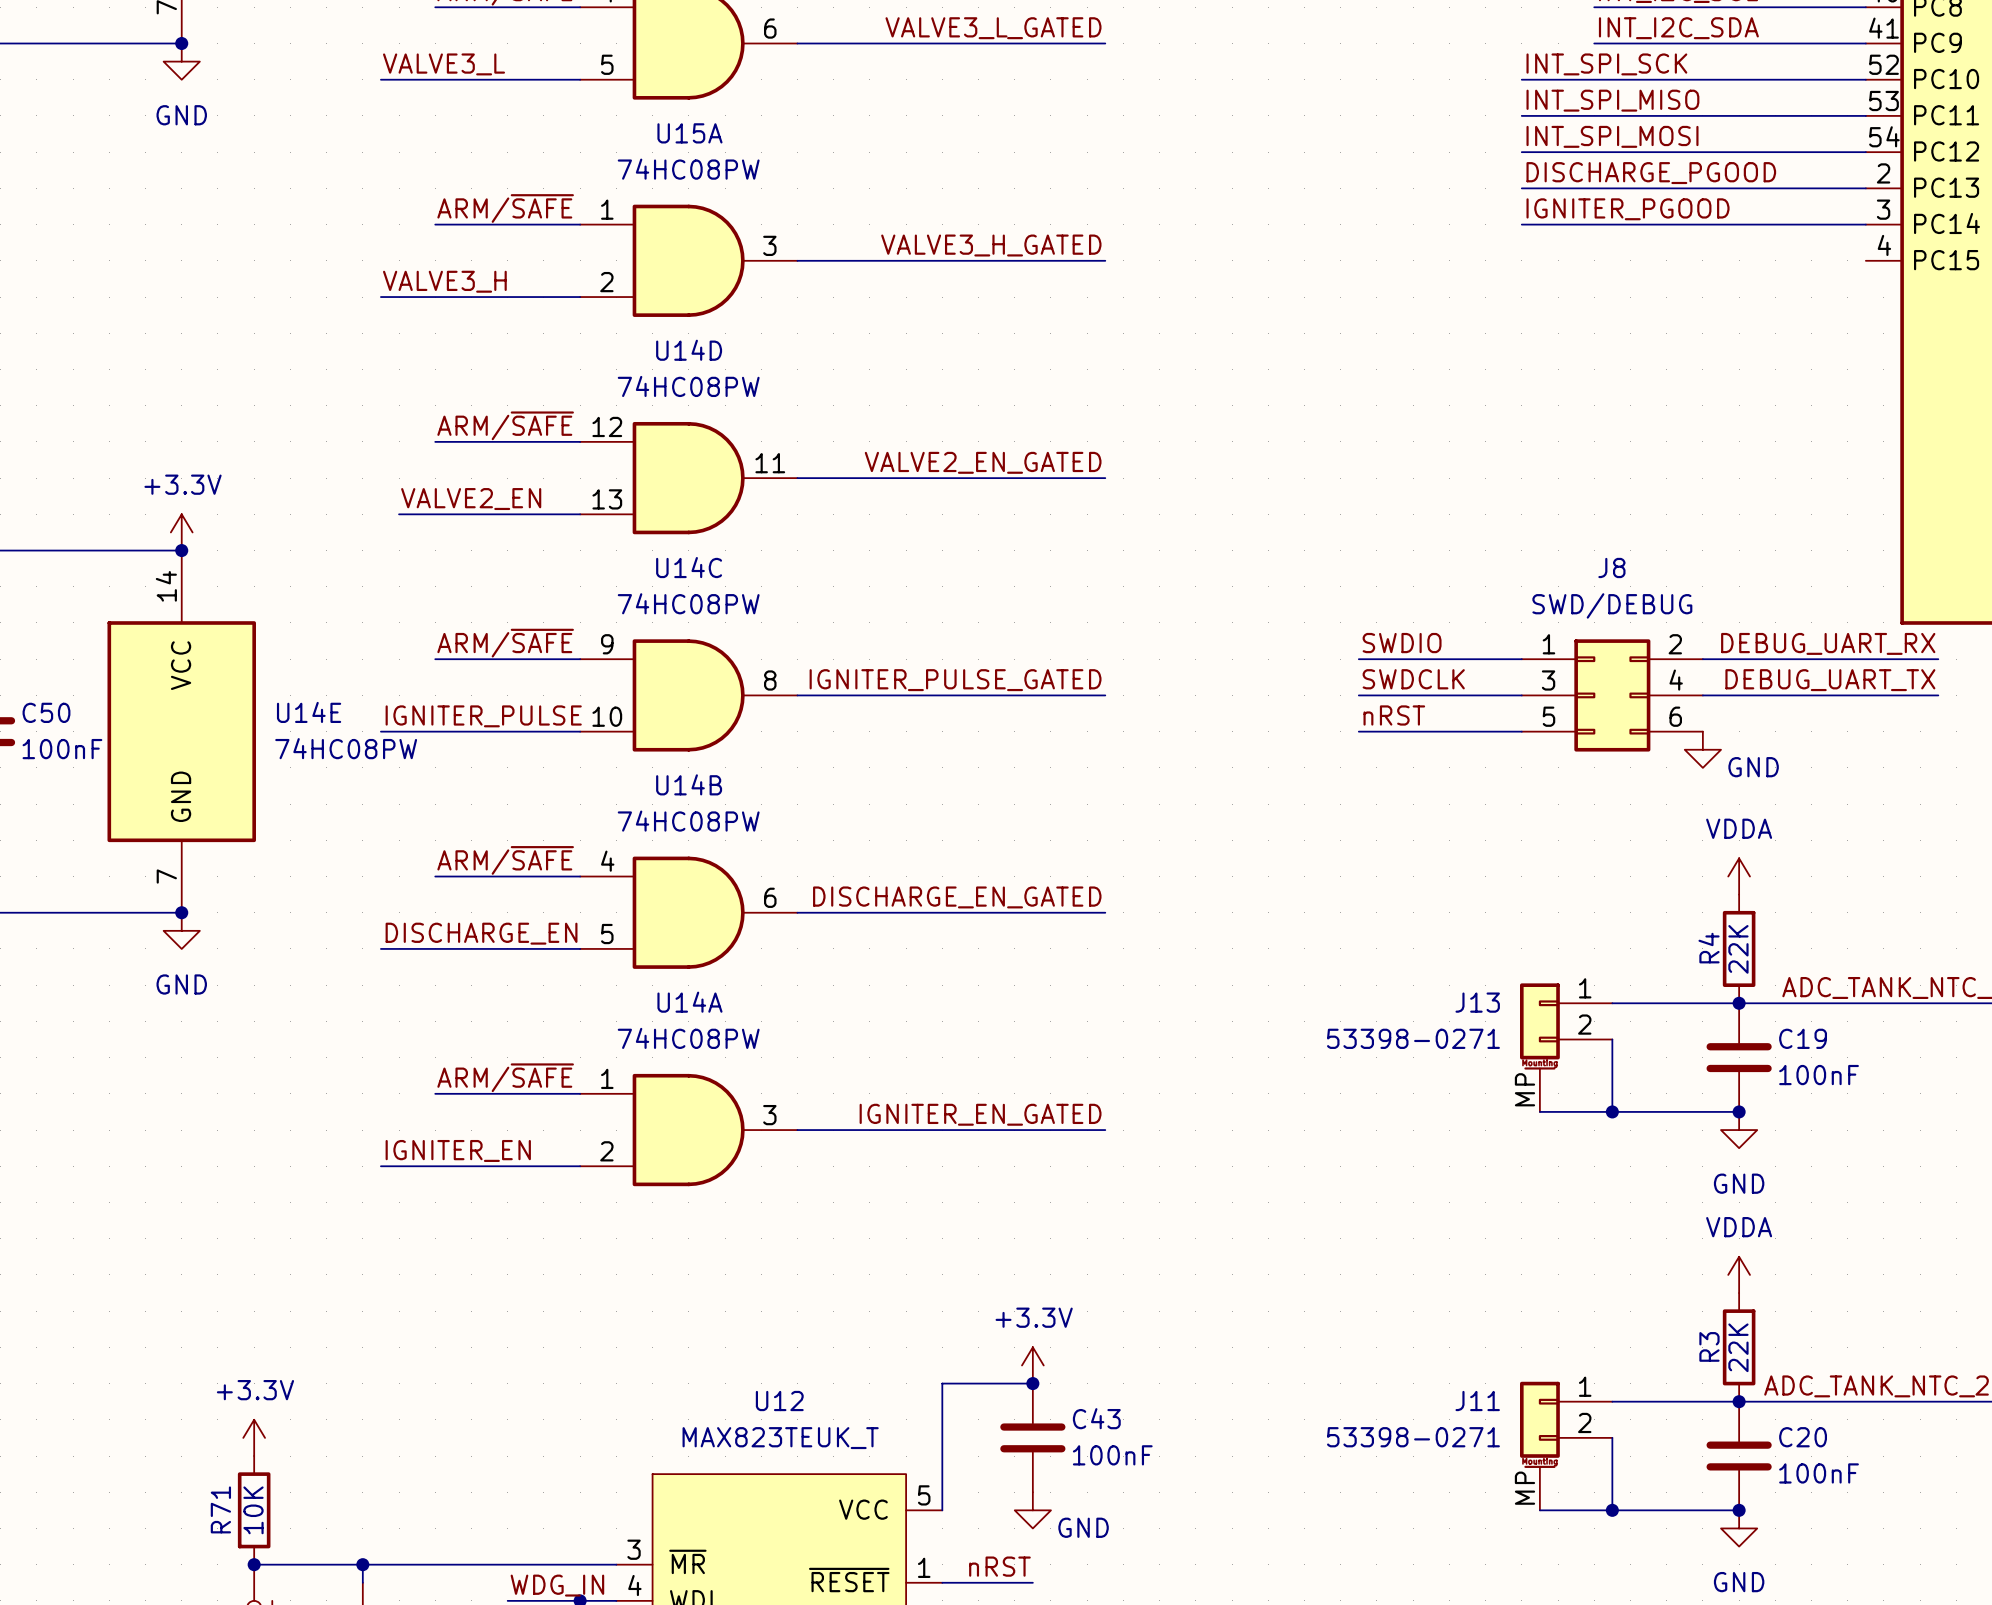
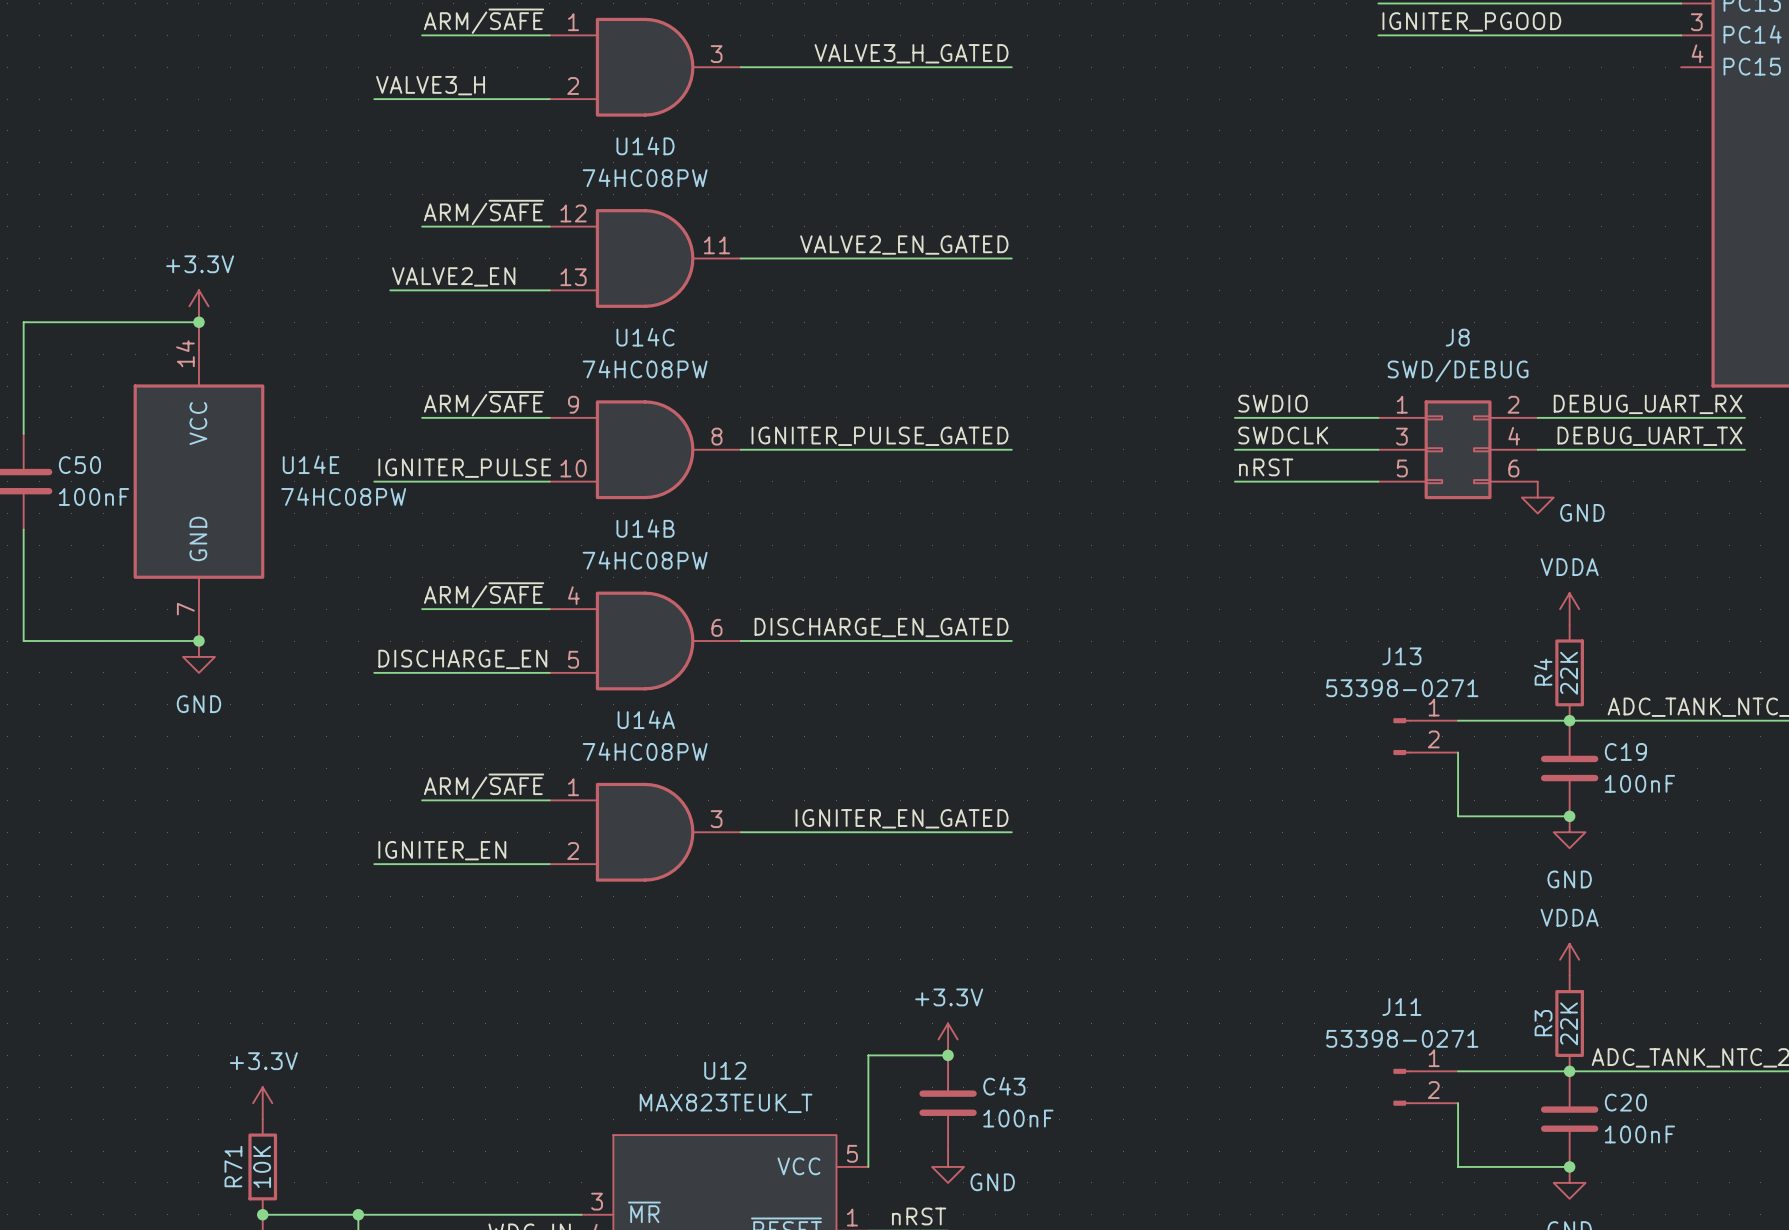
J13 symbol: [1520, 983, 1613, 1112] -> [1393, 718, 1459, 756]
J13 name position: J13 (1477, 1002) -> J13 (1401, 656)
J13 value position: 53398-0271 (1413, 1038) -> 53398-0271 (1402, 688)
wire: (1539, 1111) (1612, 1111) -> none
junction: (1612, 1111) -> none
J11 symbol: [1520, 1381, 1613, 1511] -> [1393, 1068, 1459, 1106]
J11 name position: J11 (1477, 1401) -> J11 (1401, 1006)
J11 value position: 53398-0271 (1413, 1437) -> 53398-0271 (1402, 1038)
wire: (1539, 1510) (1612, 1510) -> none
junction: (1612, 1510) -> none

